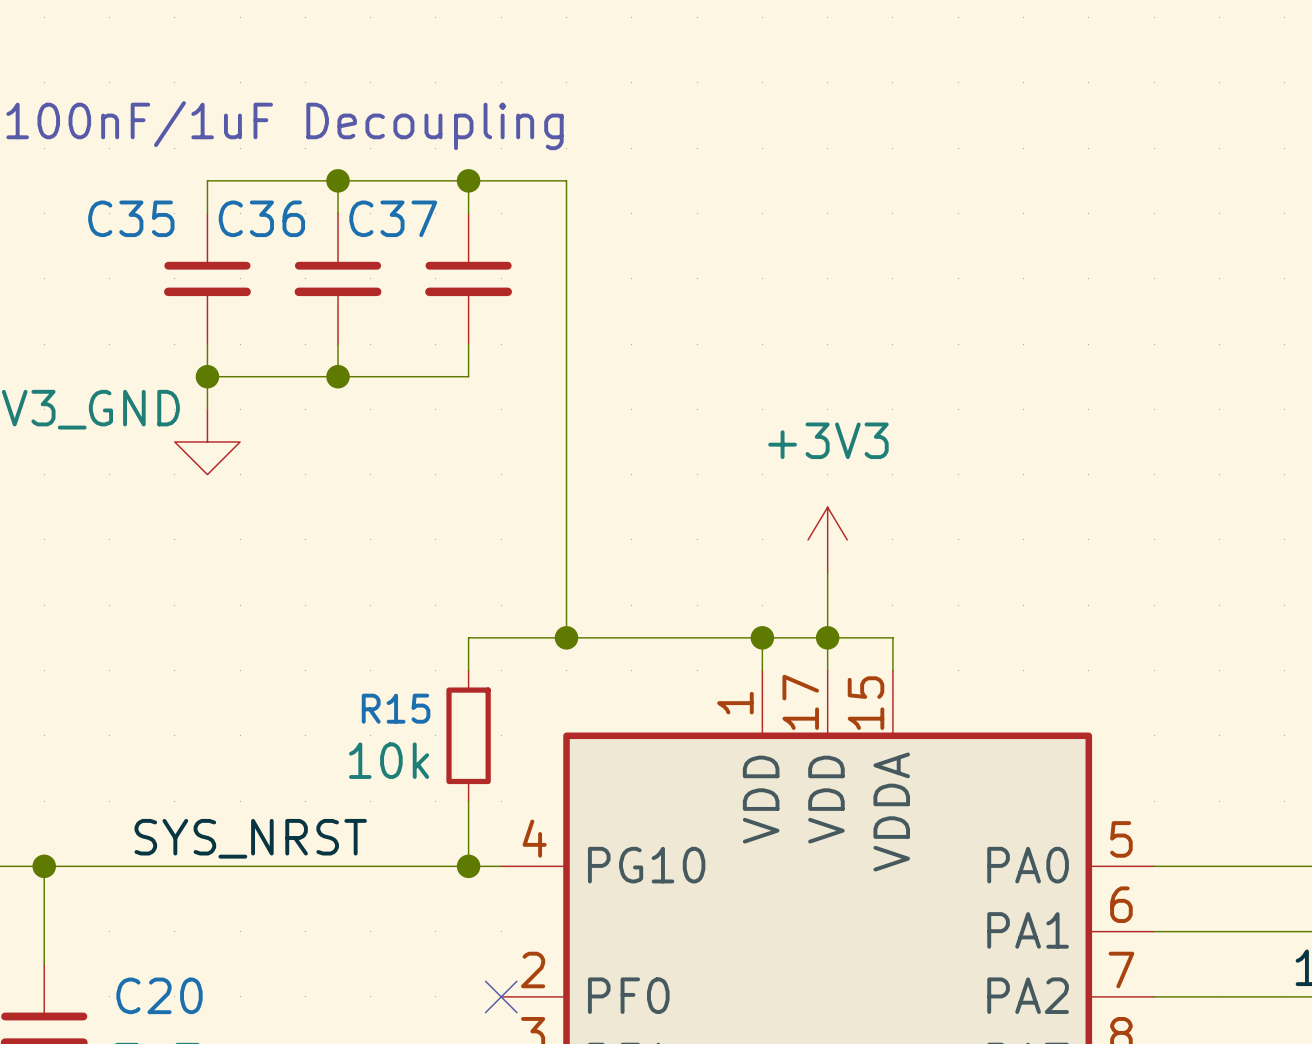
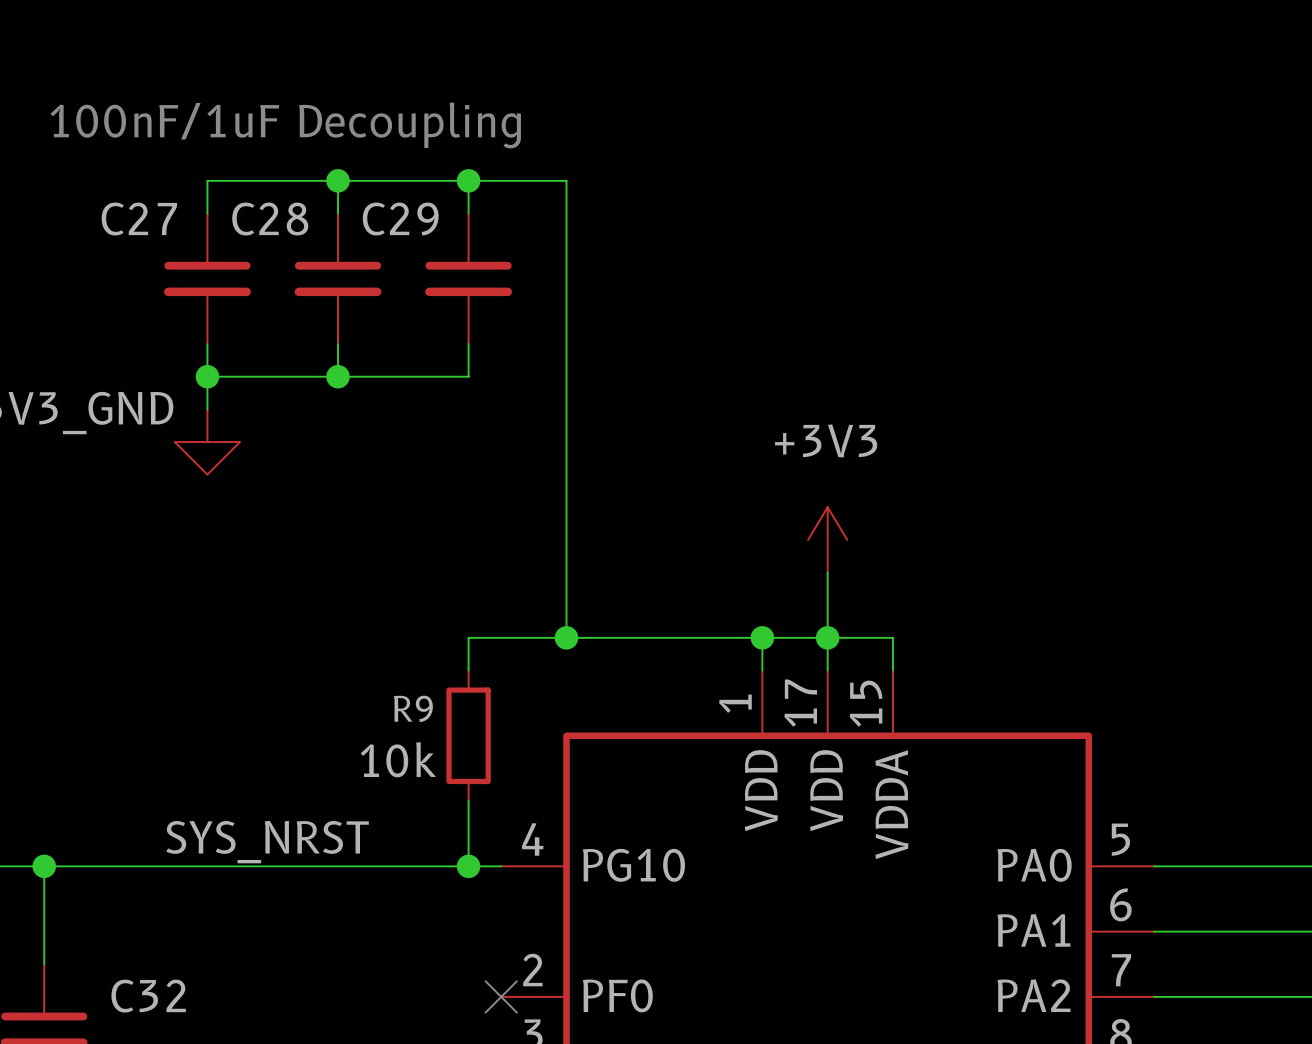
C35 name: C35 (131, 218) -> C27 (139, 219)
C36 name: C36 (261, 218) -> C28 (270, 219)
C37 name: C37 (393, 218) -> C29 (400, 219)
R15 name: R15 (396, 708) -> R9 (413, 708)
C20 name: C20 (159, 995) -> C32 (148, 996)

